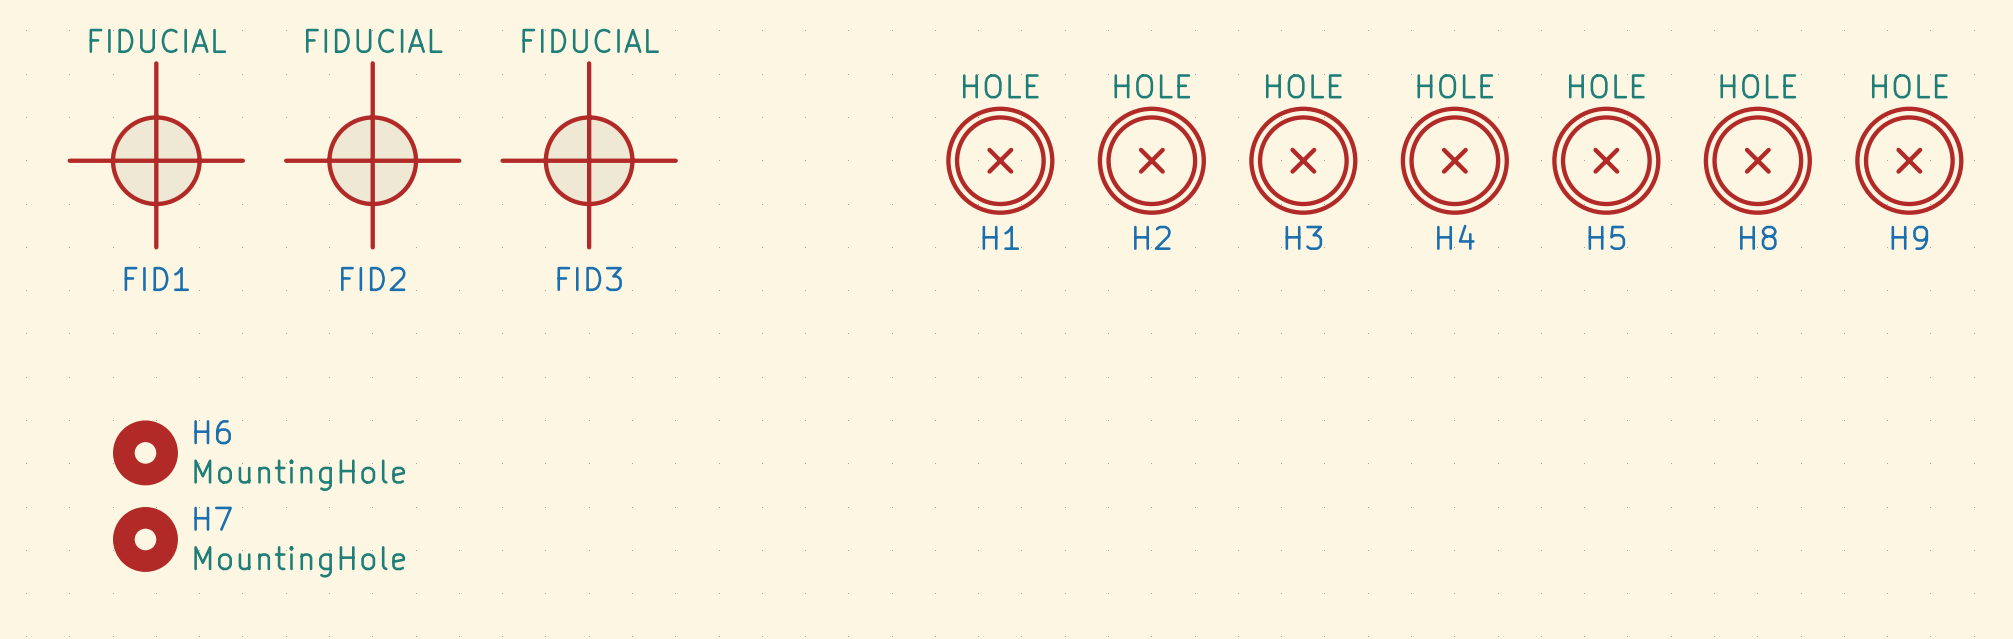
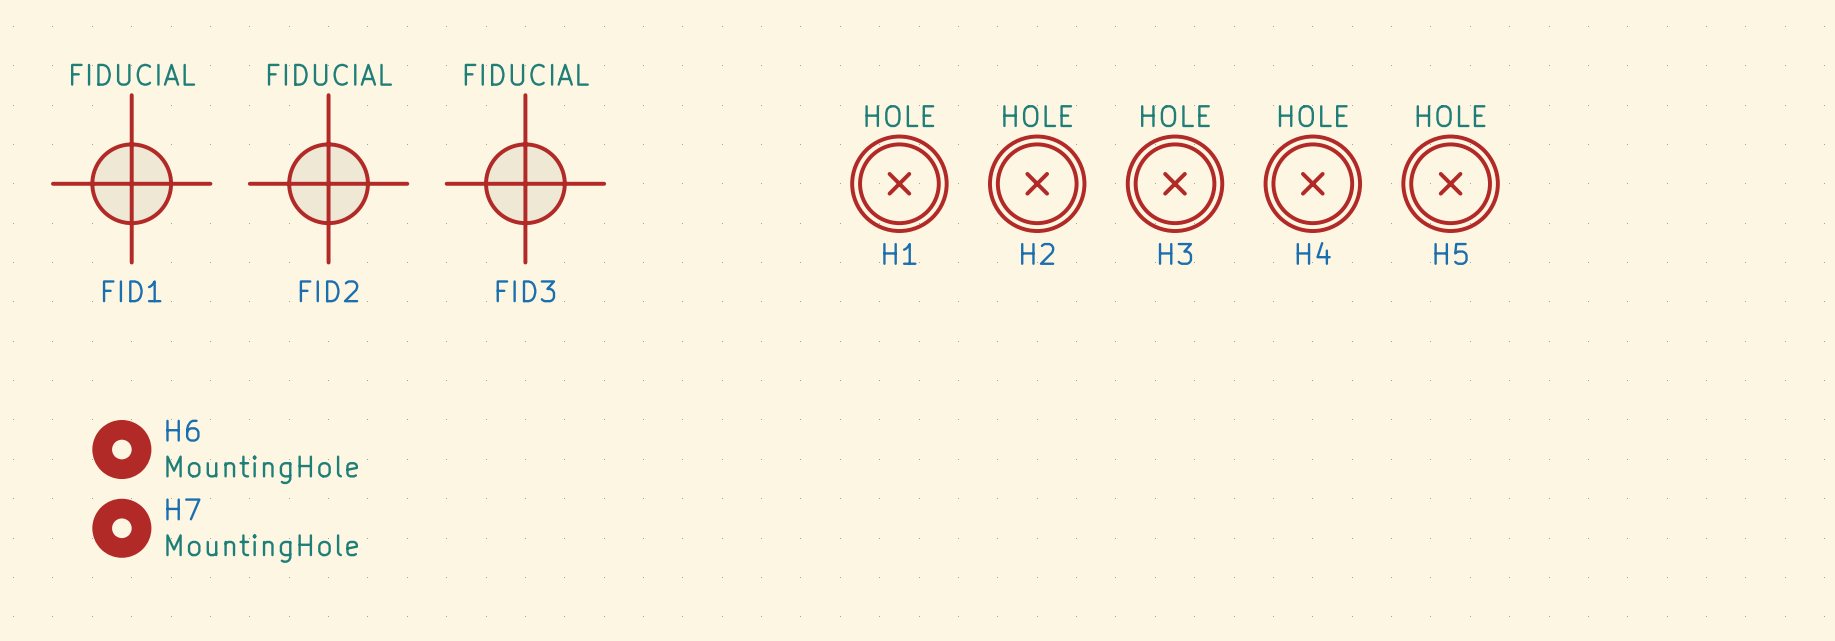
H8: HOLE (1757, 160) -> none
H9: HOLE (1909, 160) -> none

